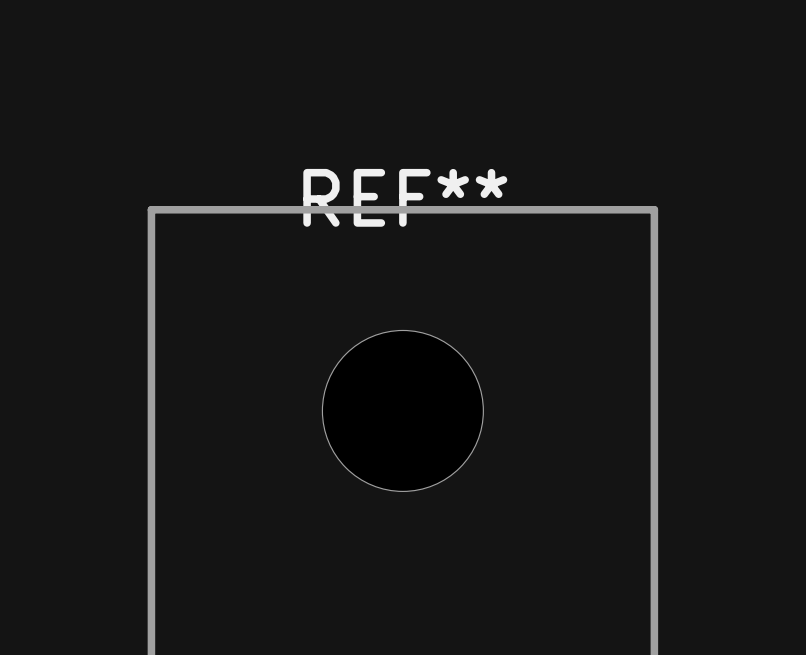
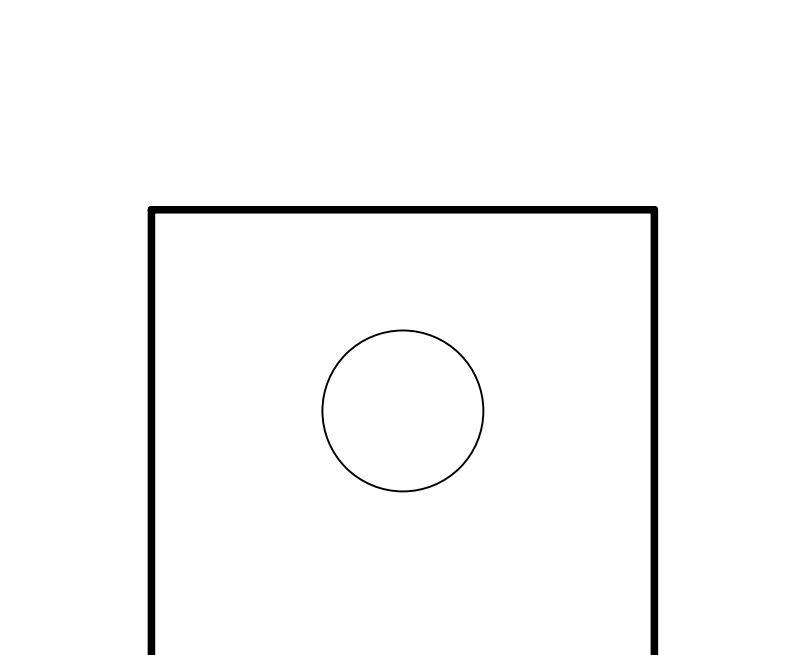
REF** name: REF** (405, 197) -> none

